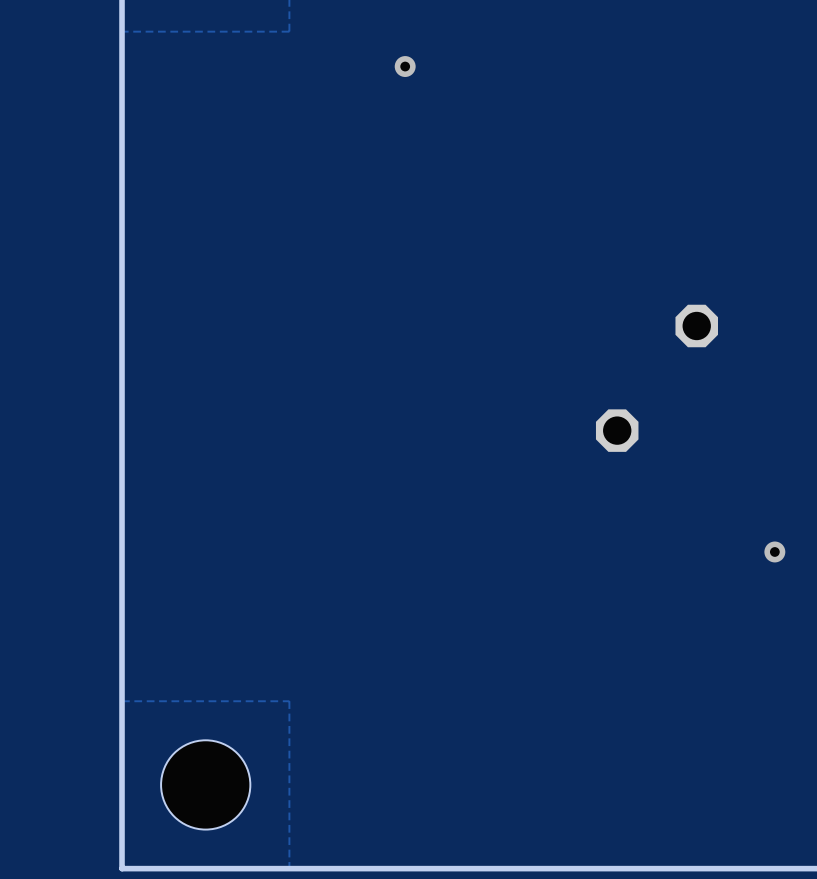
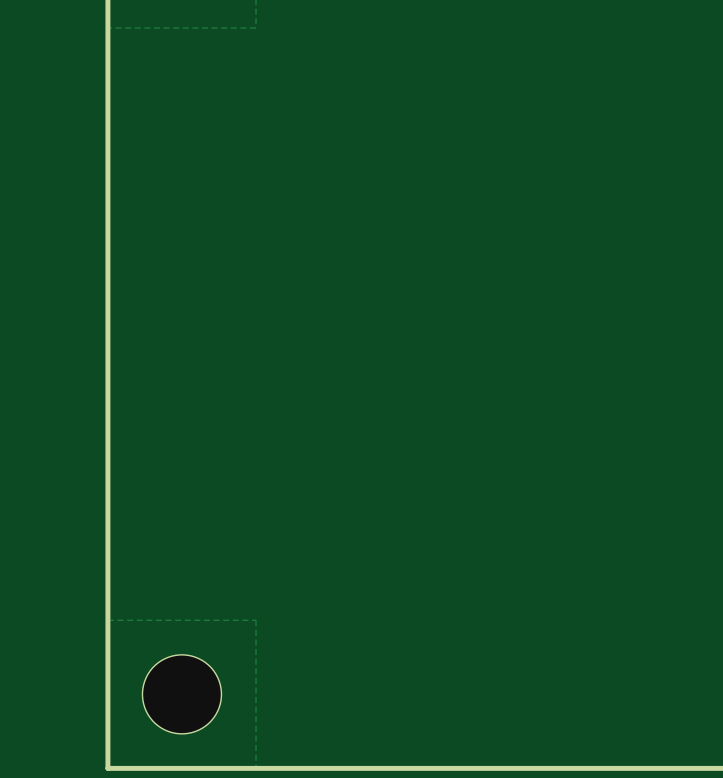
via: (405, 66) -> none
part: (696, 325) -> none
part: (617, 430) -> none
via: (774, 551) -> none

